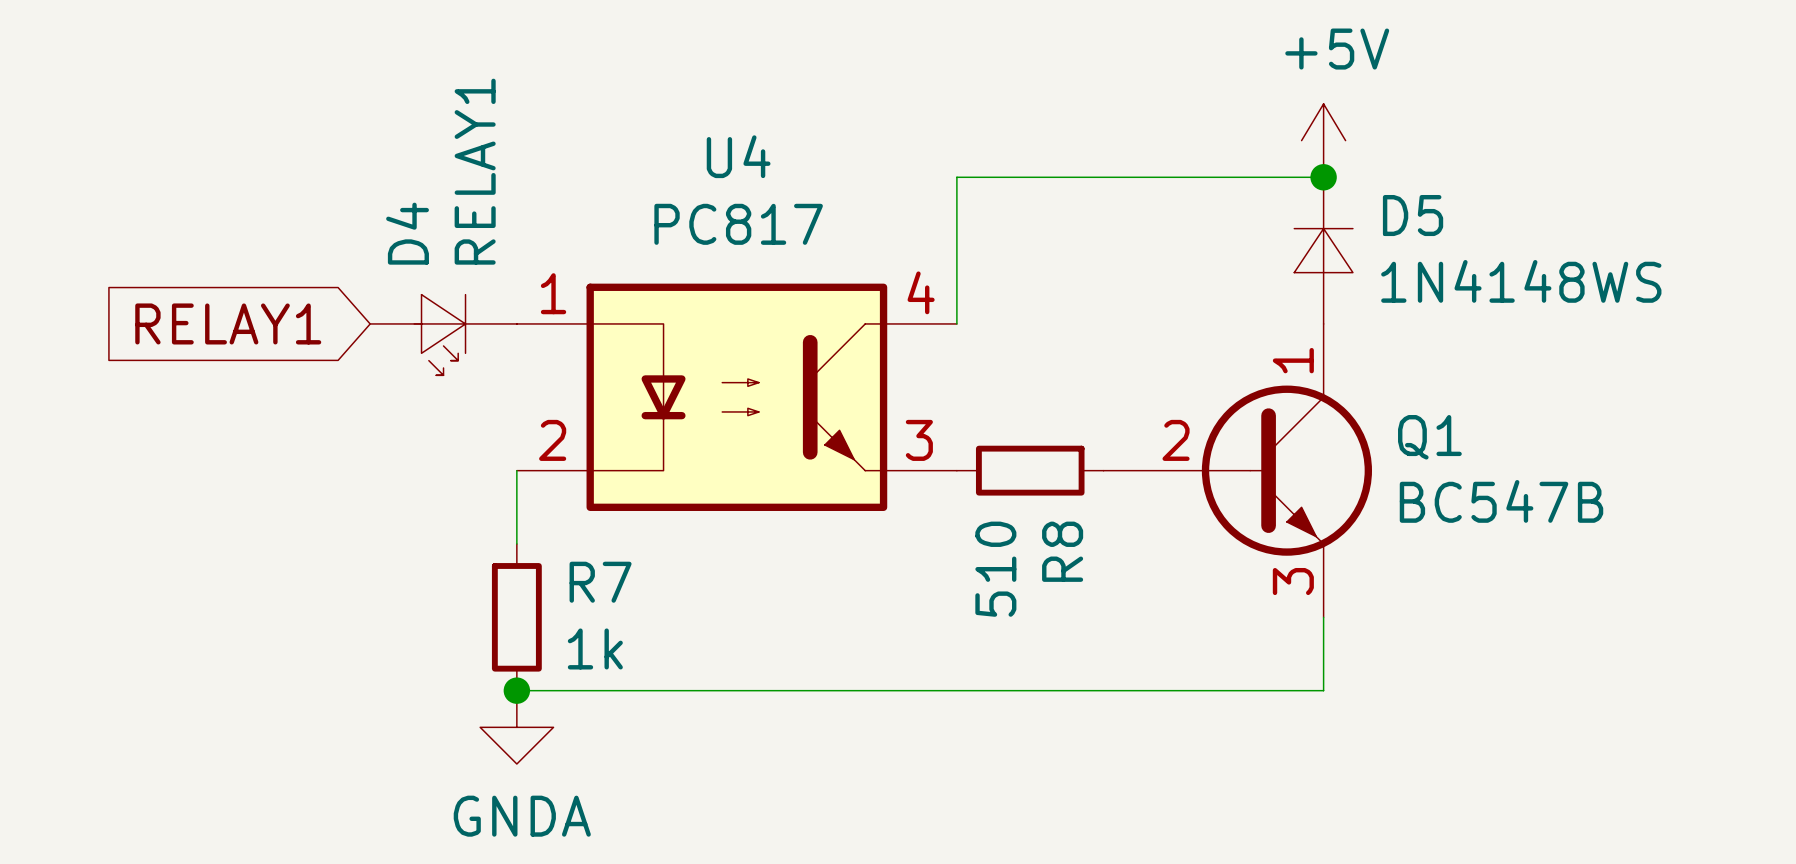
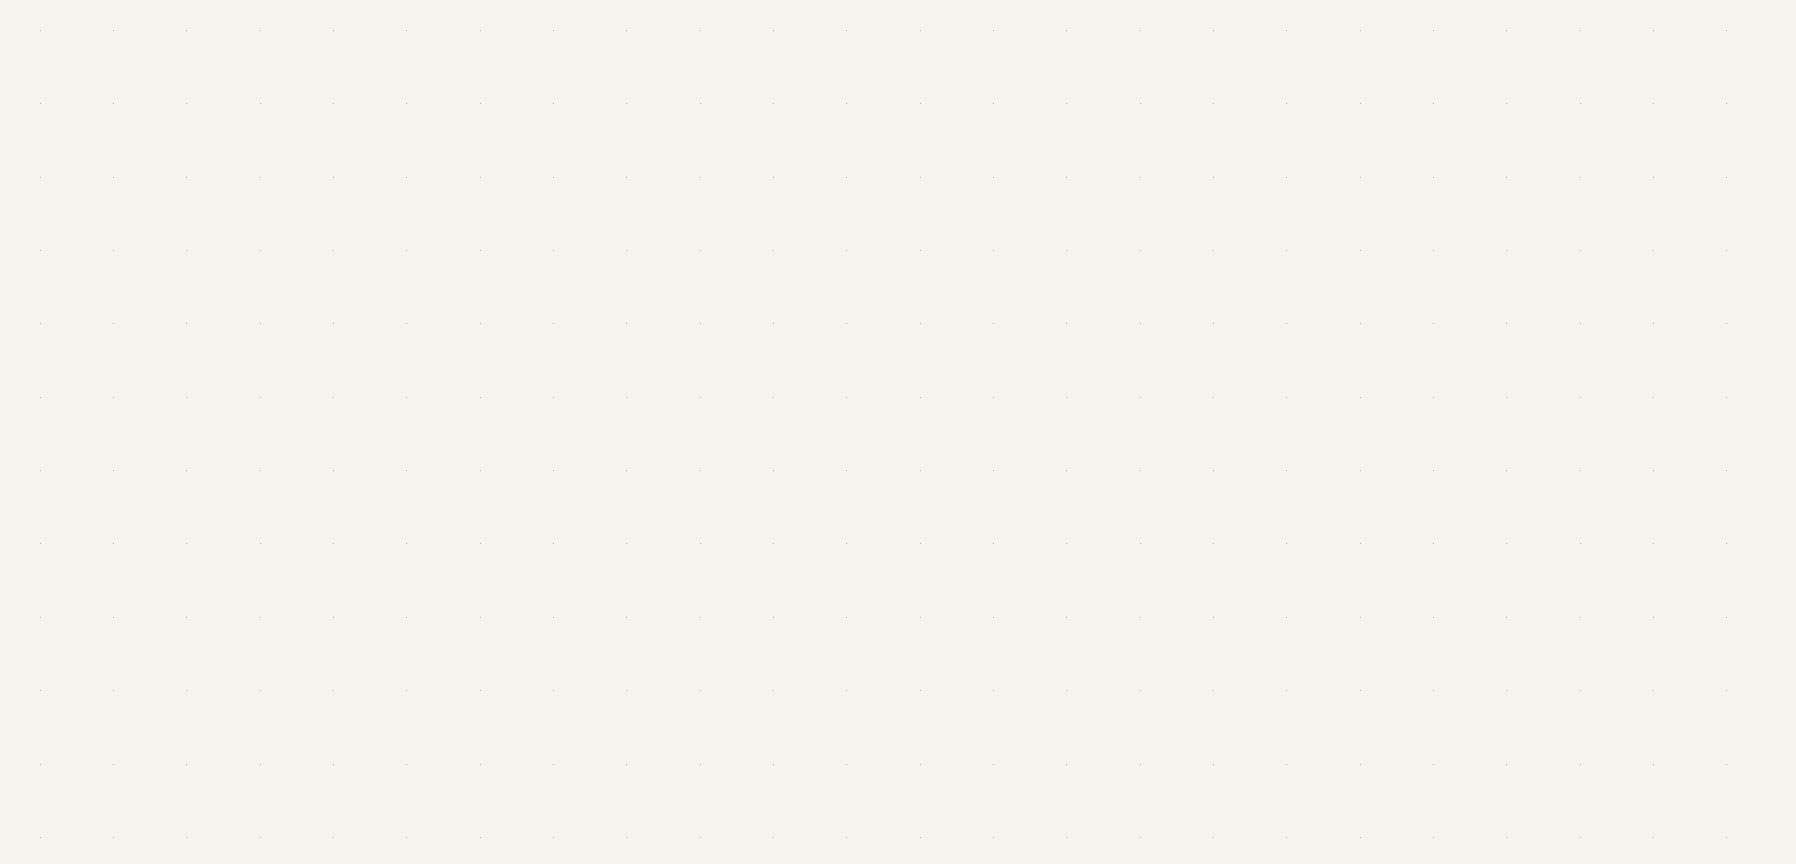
power symbol: +5V (1323, 140) -> none
wire: (1323, 177) (956, 177) (956, 323) -> none
junction: (1323, 177) -> none
D5: 1N4148WS (1323, 250) -> none
global label: RELAY1 (228, 323) -> none
D4: RELAY1 (443, 334) -> none
U4: PC817 (736, 397) -> none
wire: (516, 470) (516, 543) -> none
R8: 510 (1030, 470) -> none
Q1: BC547B (1237, 470) -> none
R7: 1k (516, 617) -> none
wire: (1323, 617) (1323, 690) (516, 690) -> none
junction: (516, 690) -> none
power symbol: GNDA (516, 727) -> none

